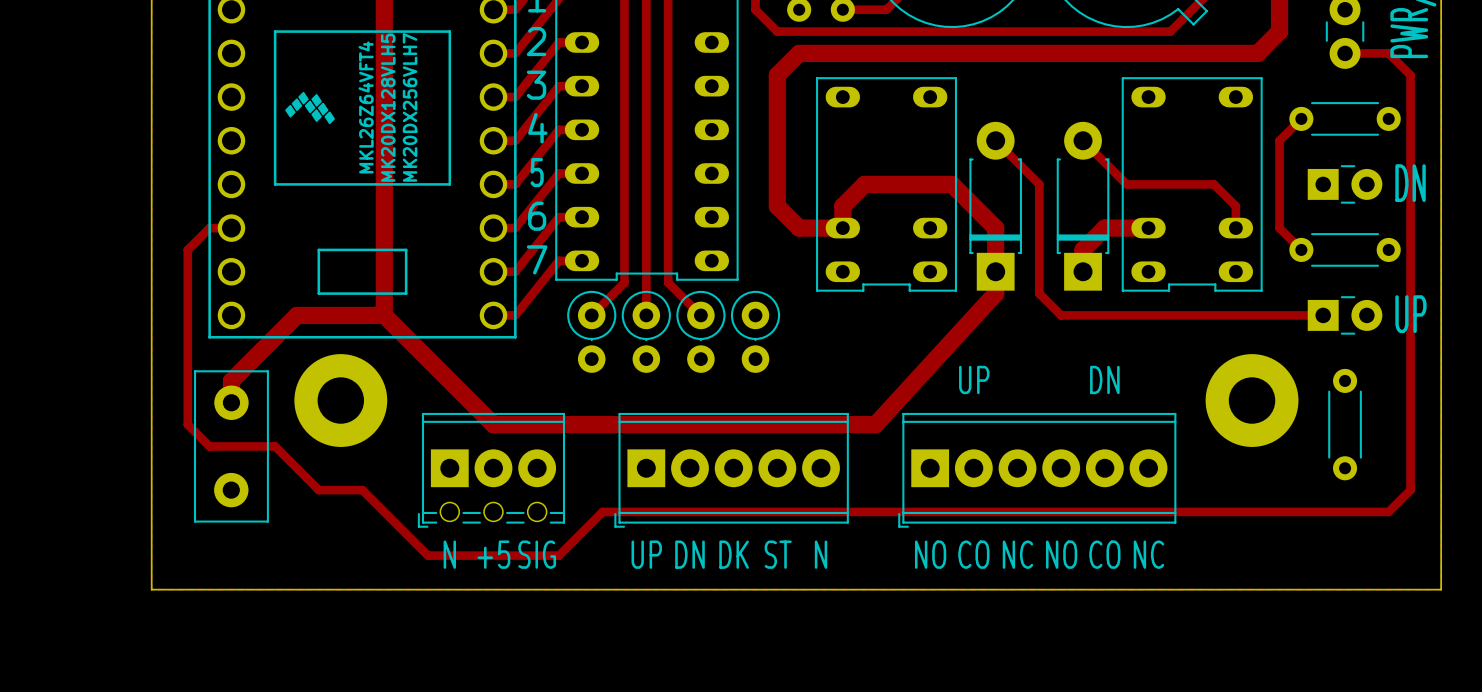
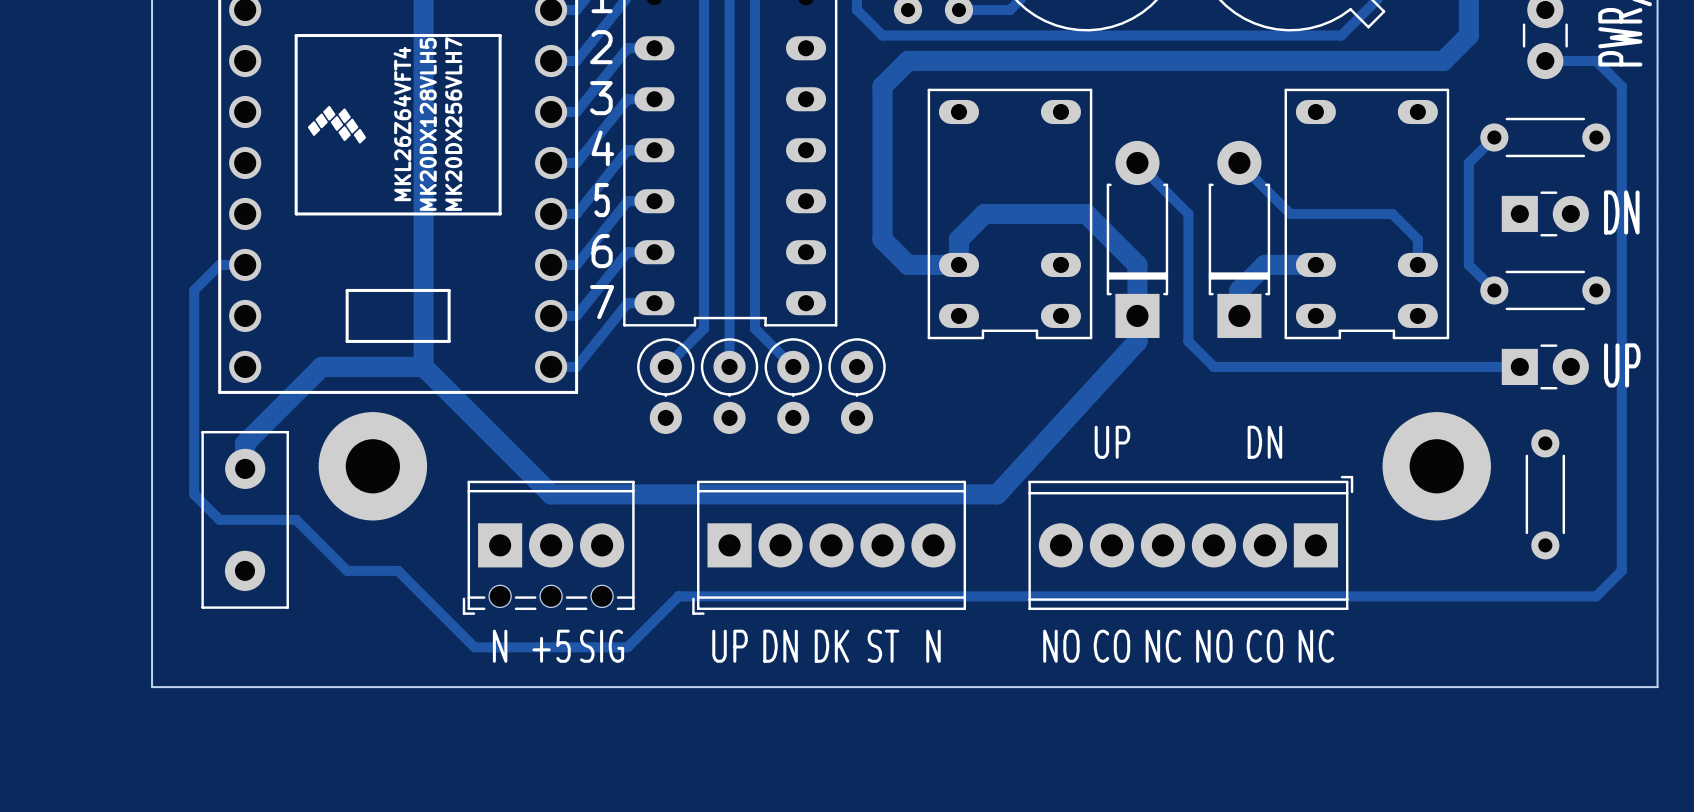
part rotation: 0° (1037, 470) -> 180° (1190, 542)

